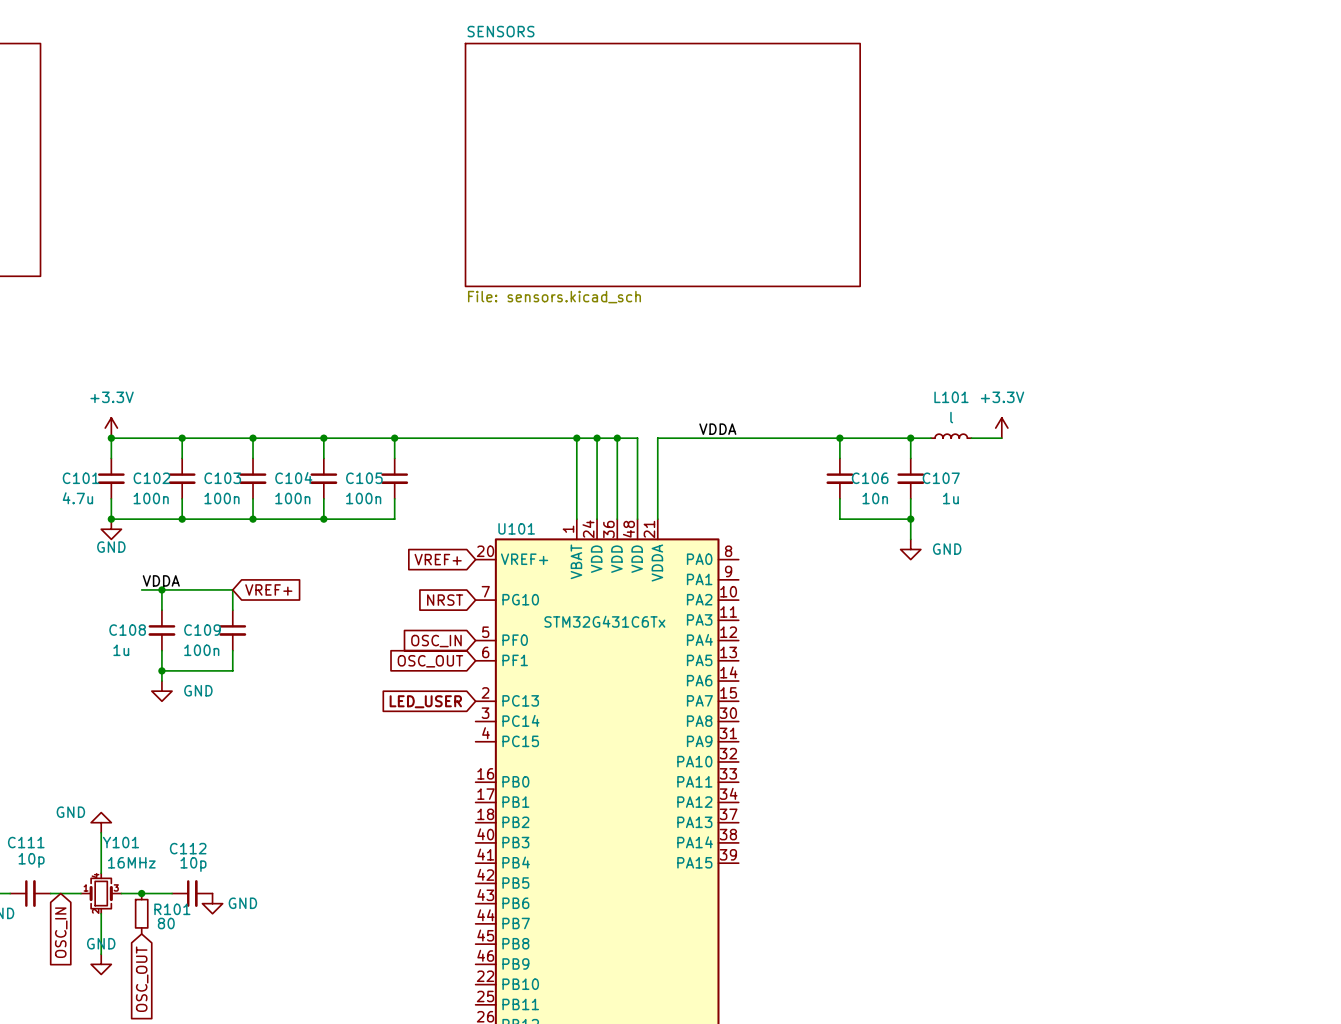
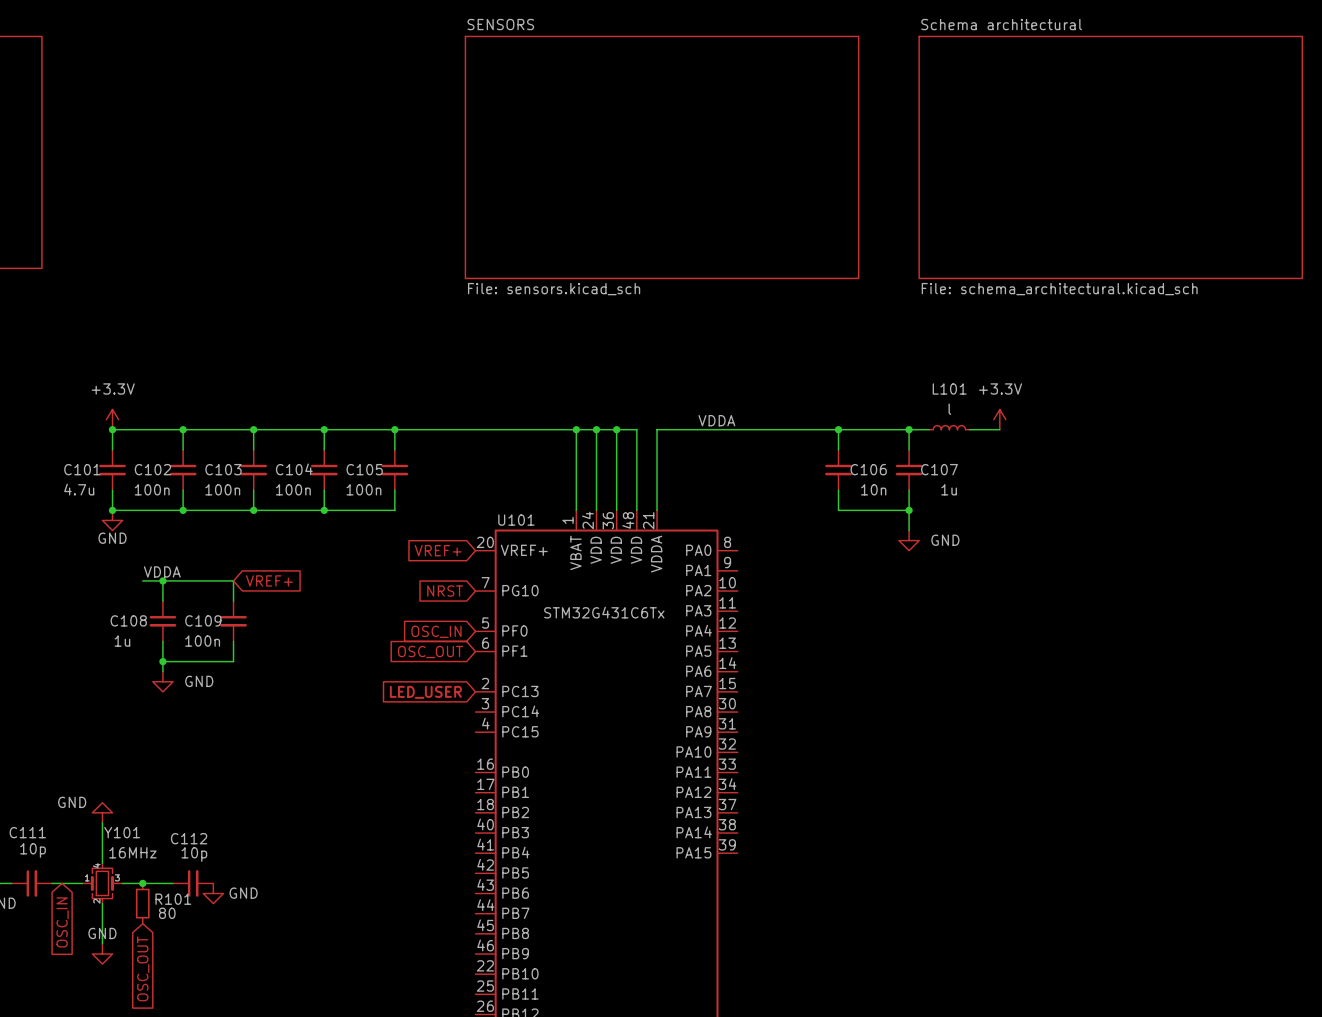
sheet Schema architectural: none -> File: schema_architectural.kicad_sch (1110, 157)

